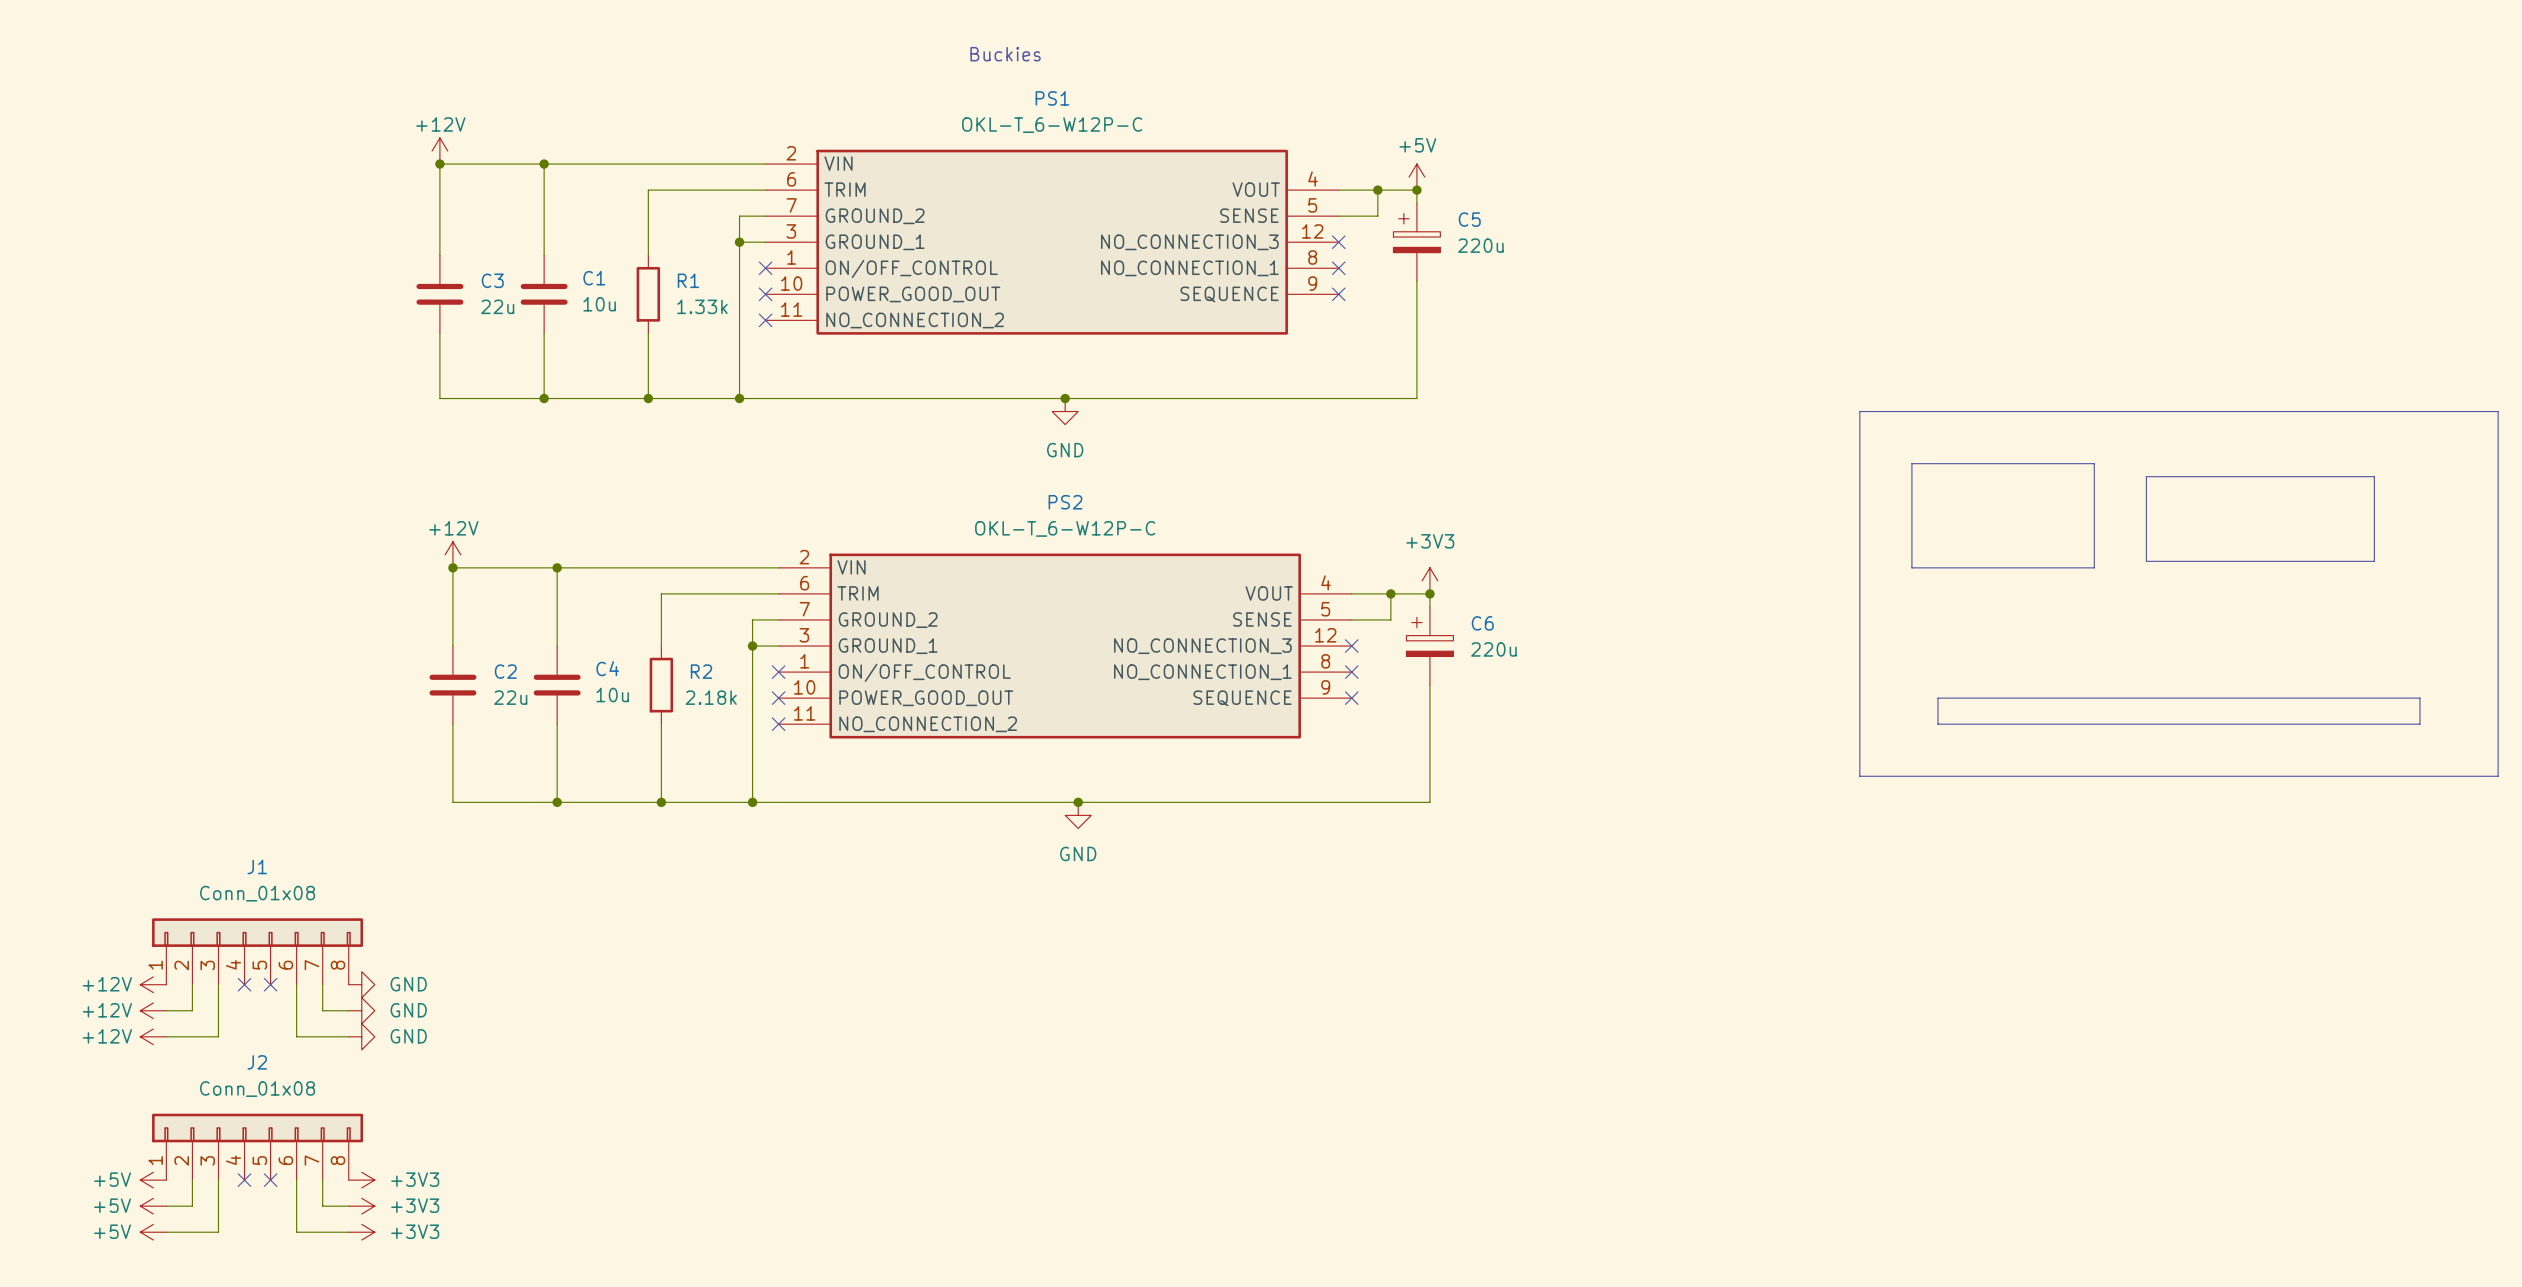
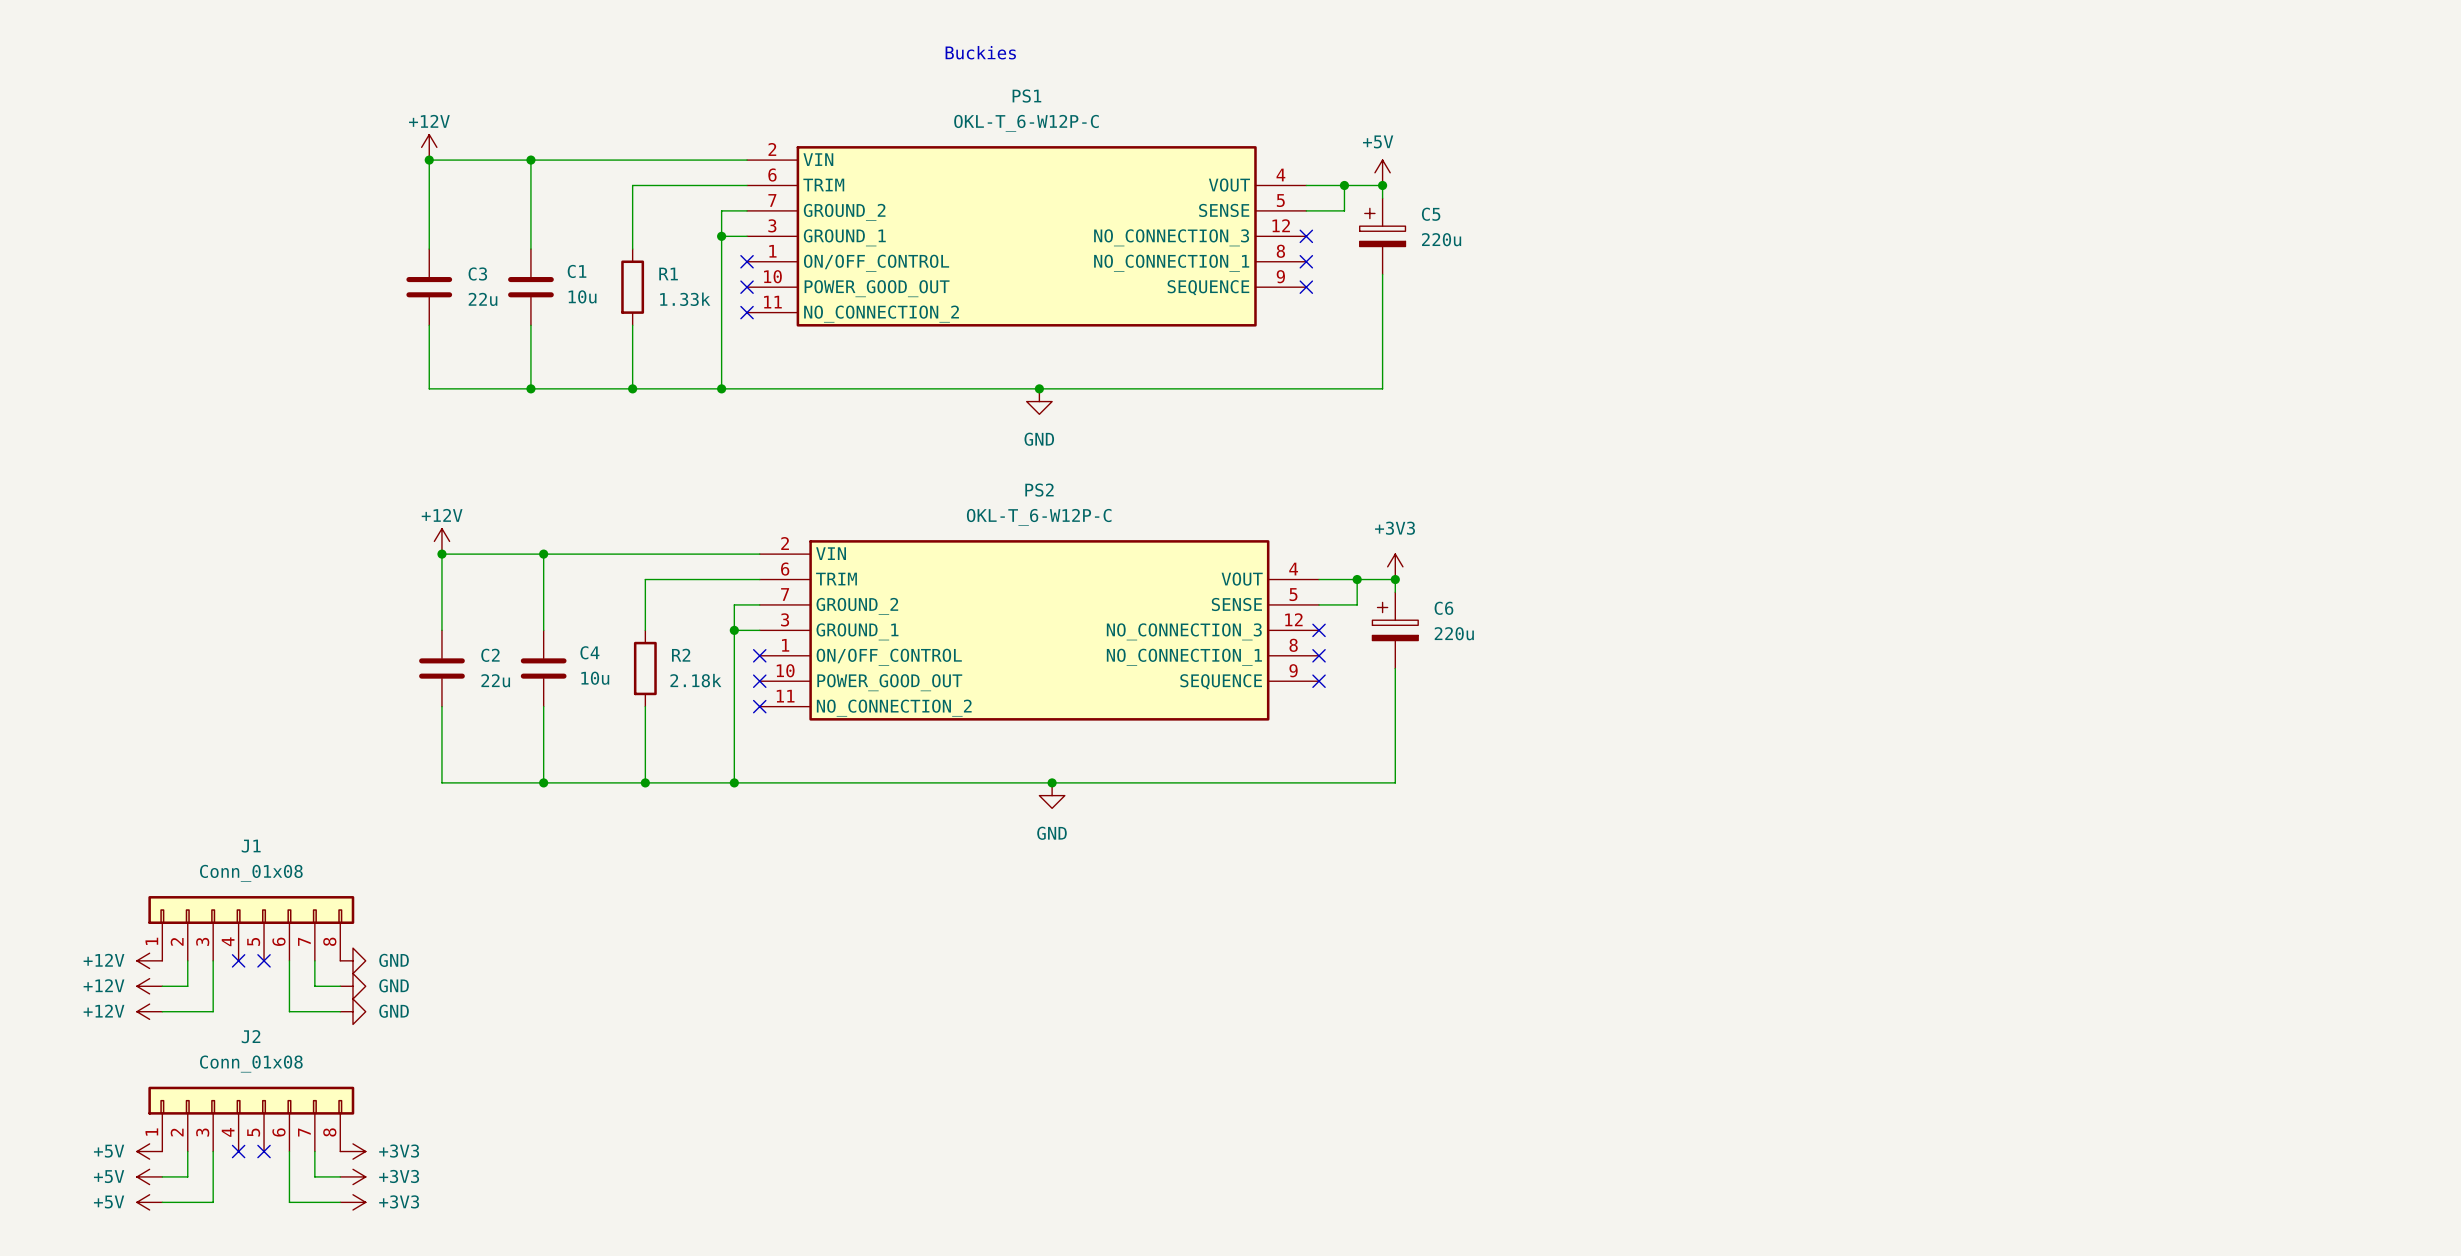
line: (1859, 411) (2498, 411) (2498, 776) (1859, 776) (1859, 411) -> none
line: (1911, 463) (2094, 463) (2094, 567) (1911, 567) (1911, 463) -> none
line: (2146, 476) (2374, 476) (2374, 561) (2146, 561) (2146, 476) -> none
line: (1937, 698) (2419, 698) (2419, 724) (1937, 724) (1937, 698) -> none

